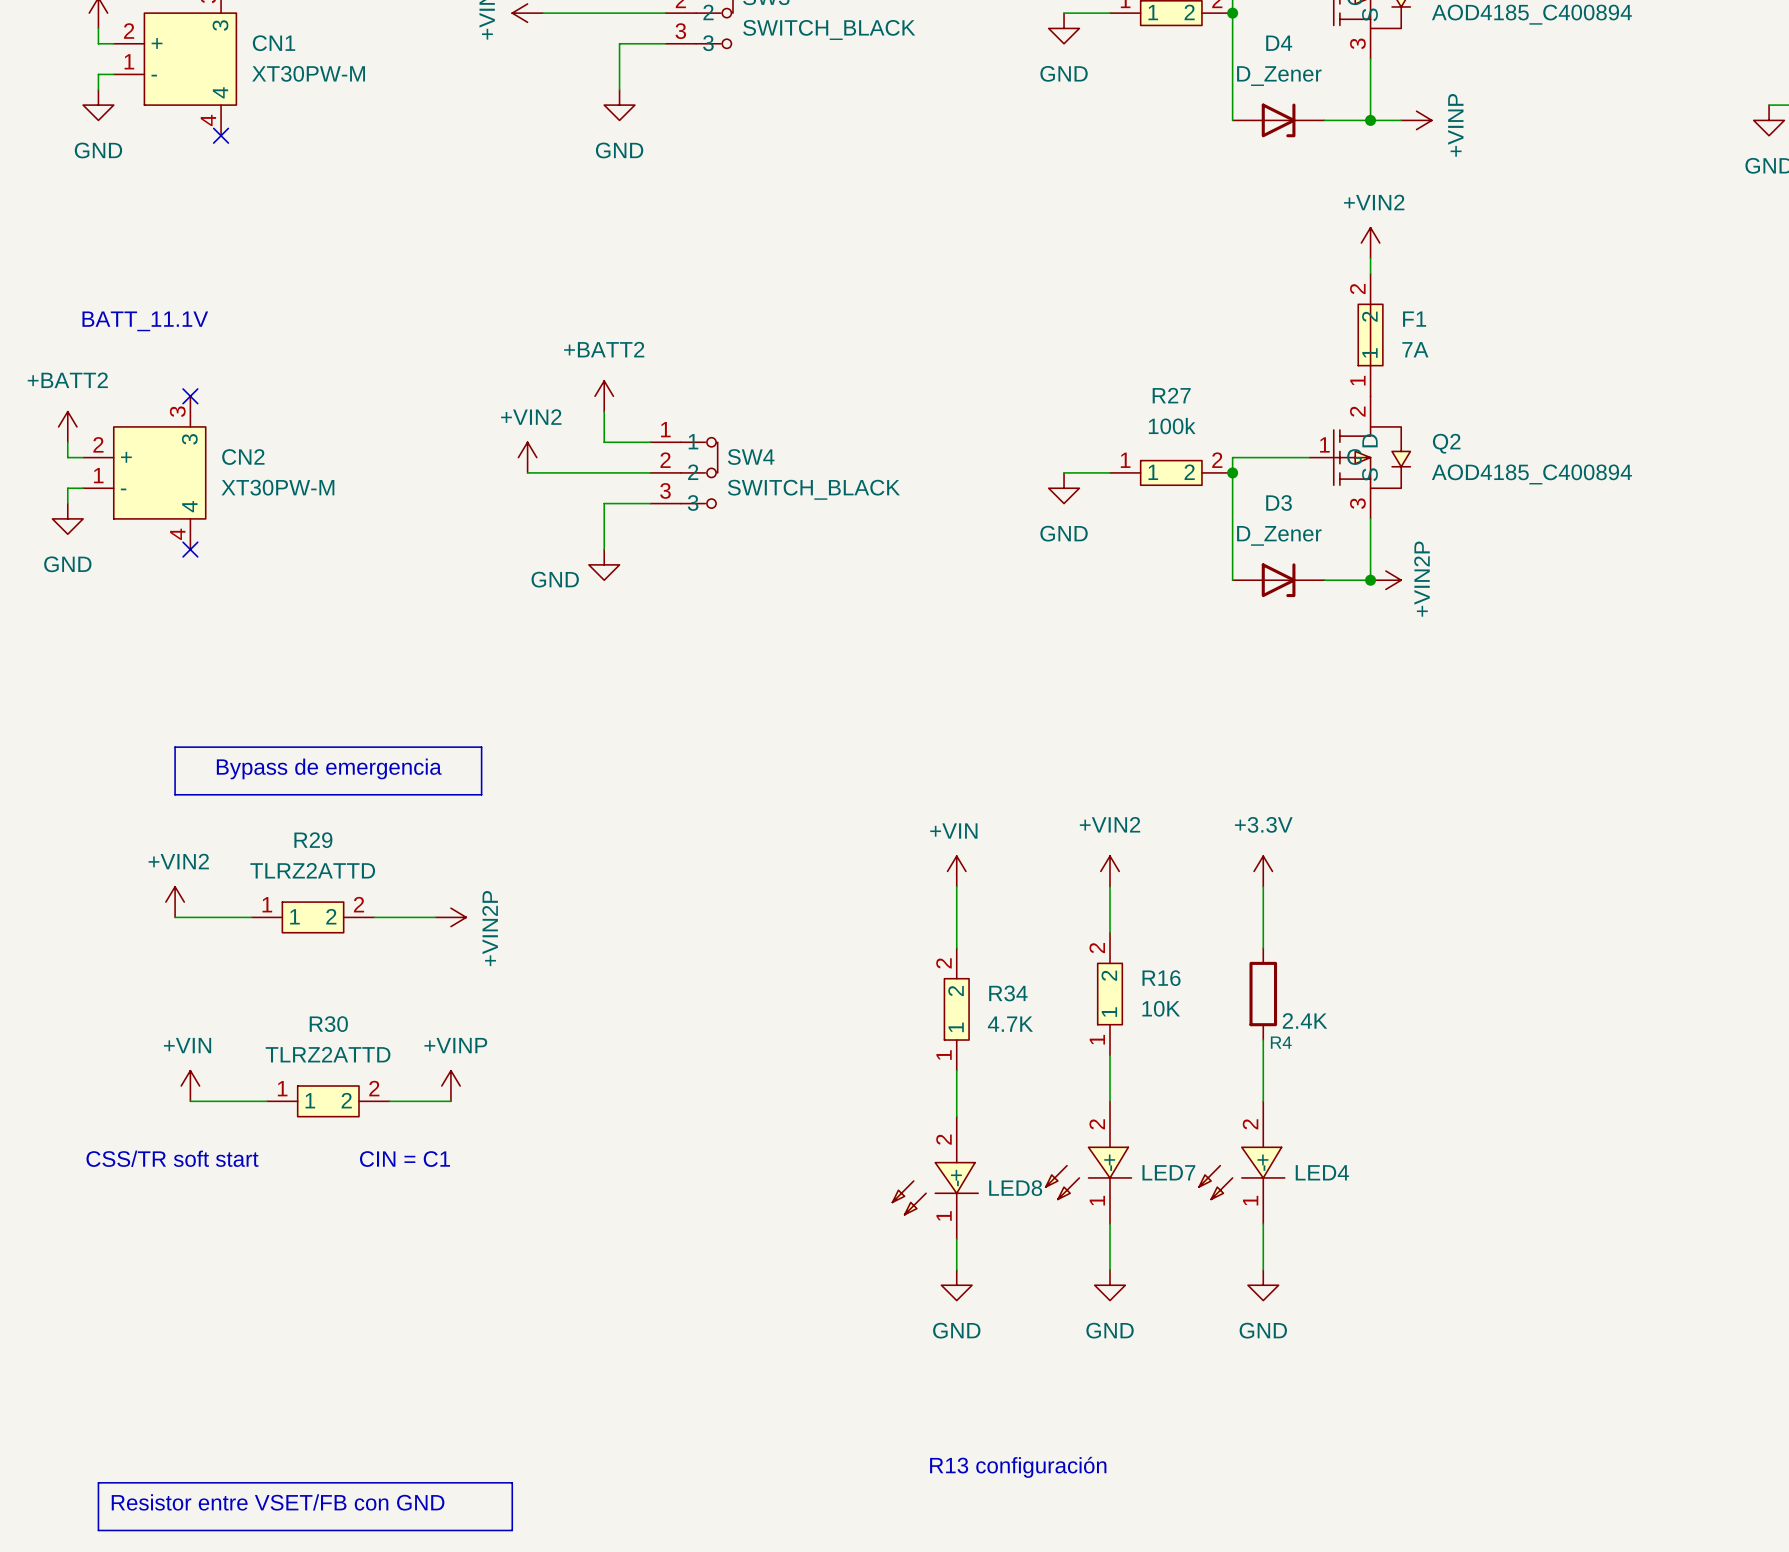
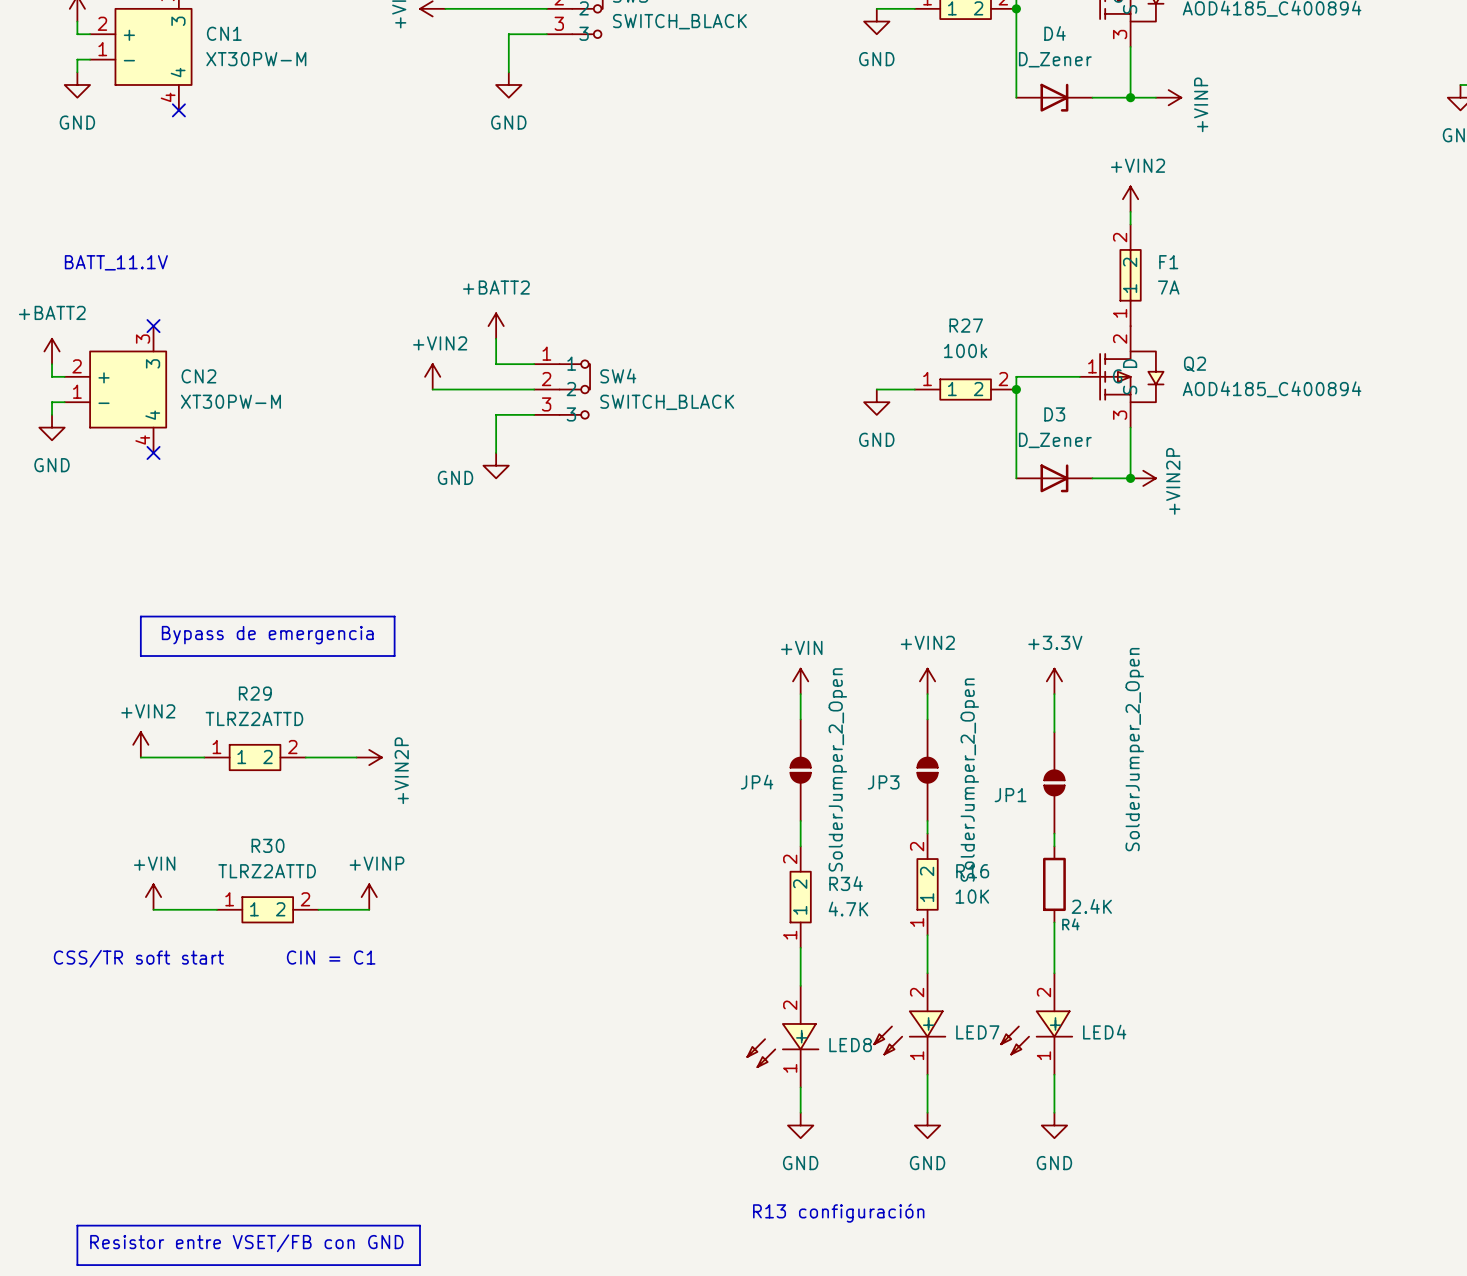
wire: none -> (800, 694) (800, 719)
wire: none -> (927, 694) (927, 719)
power symbol position: +VIN (956, 871) -> +VIN (800, 681)
power symbol position: +VIN2 (1110, 871) -> +VIN2 (927, 681)
power symbol position: +3.3V (1263, 871) -> +3.3V (1054, 681)
wire: (956, 886) (956, 948) -> none
wire: (1110, 886) (1110, 932) -> (1054, 694) (1054, 732)
wire: (1263, 886) (1263, 948) -> none
JP4: none -> SolderJumper_2_Open (800, 770)
JP3: none -> SolderJumper_2_Open (927, 770)
JP1: none -> SolderJumper_2_Open (1054, 782)
wire: none -> (800, 820) (800, 846)
R16 position: (1110, 994) -> (927, 884)
wire: none -> (927, 820) (927, 833)
R4 position: (1263, 994) -> (1054, 884)
R34 position: (956, 1009) -> (800, 897)
wire: none -> (1054, 833) (1054, 846)
wire: (1263, 1040) (1263, 1101) -> (1054, 922) (1054, 973)
wire: (1110, 1055) (1110, 1101) -> (927, 935) (927, 973)
wire: (956, 1070) (956, 1116) -> (800, 947) (800, 985)
LED7 position: (1088, 1162) -> (909, 1023)
LED4 position: (1241, 1162) -> (1036, 1023)
LED8 position: (935, 1177) -> (782, 1036)
wire: (1110, 1223) (1110, 1269) -> (927, 1074) (927, 1112)
wire: (1263, 1223) (1263, 1269) -> (1054, 1074) (1054, 1112)
wire: (956, 1239) (956, 1269) -> (800, 1087) (800, 1112)
power symbol position: GND (956, 1285) -> GND (800, 1125)
power symbol position: GND (1110, 1285) -> GND (927, 1125)
power symbol position: GND (1263, 1285) -> GND (1054, 1125)

